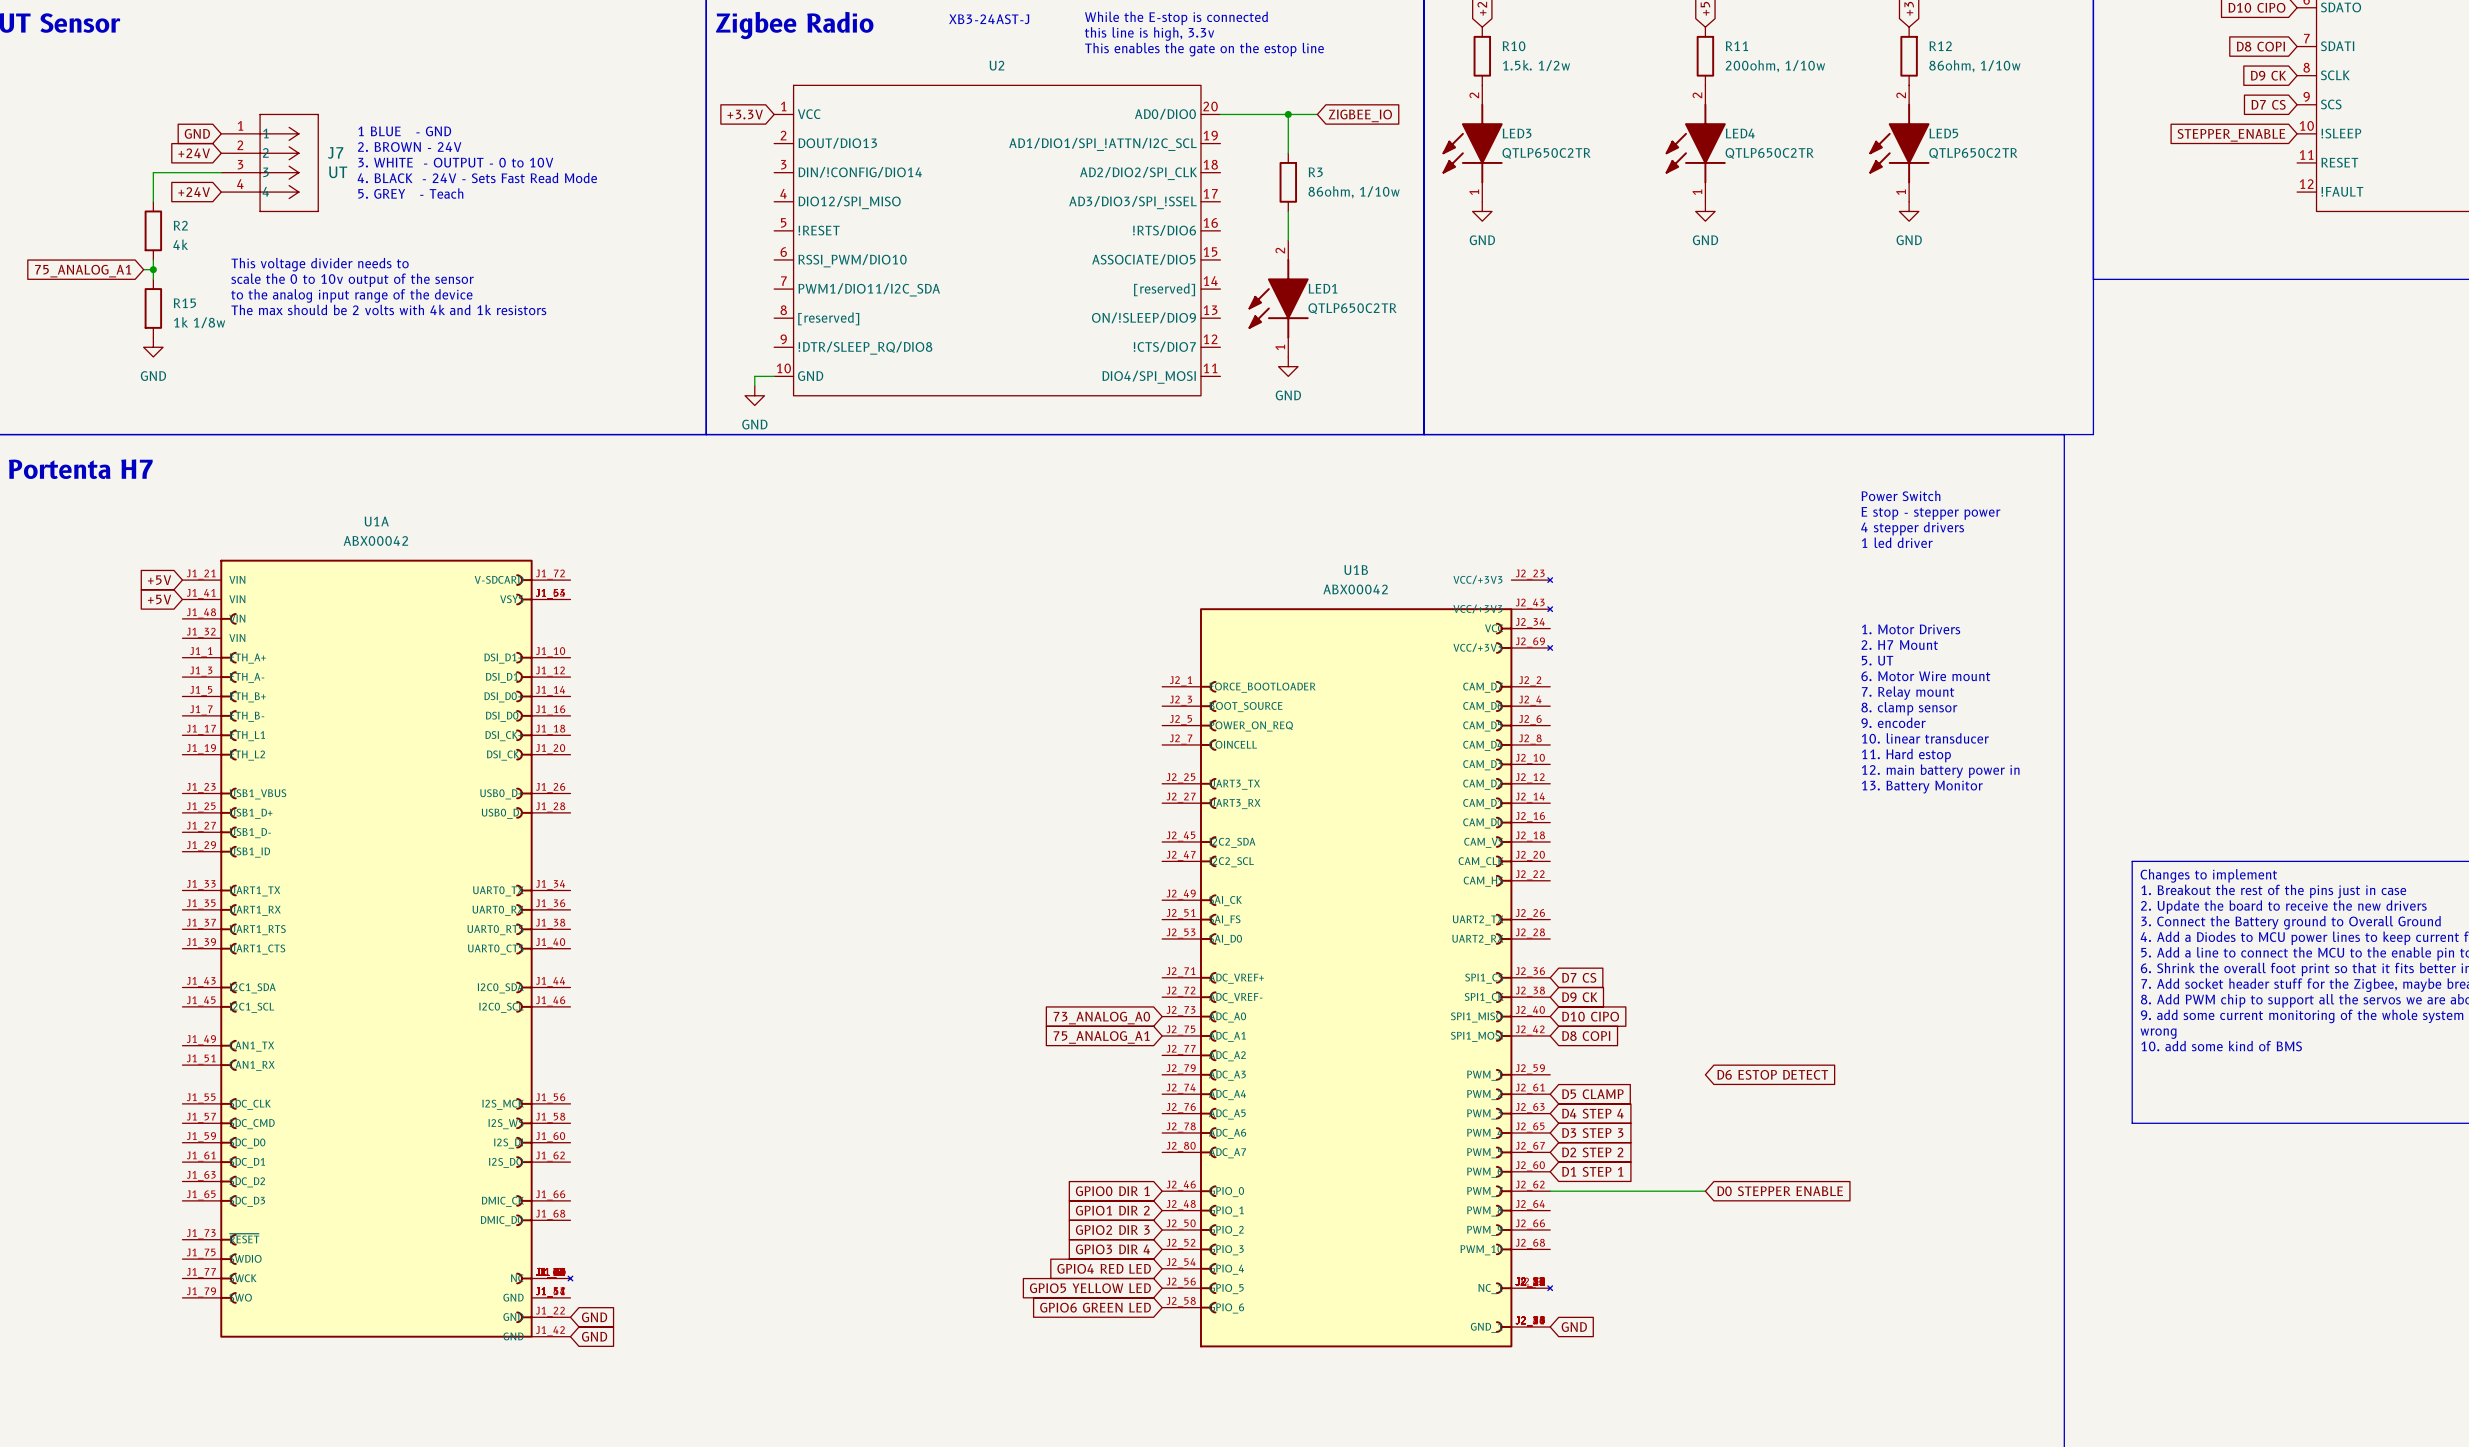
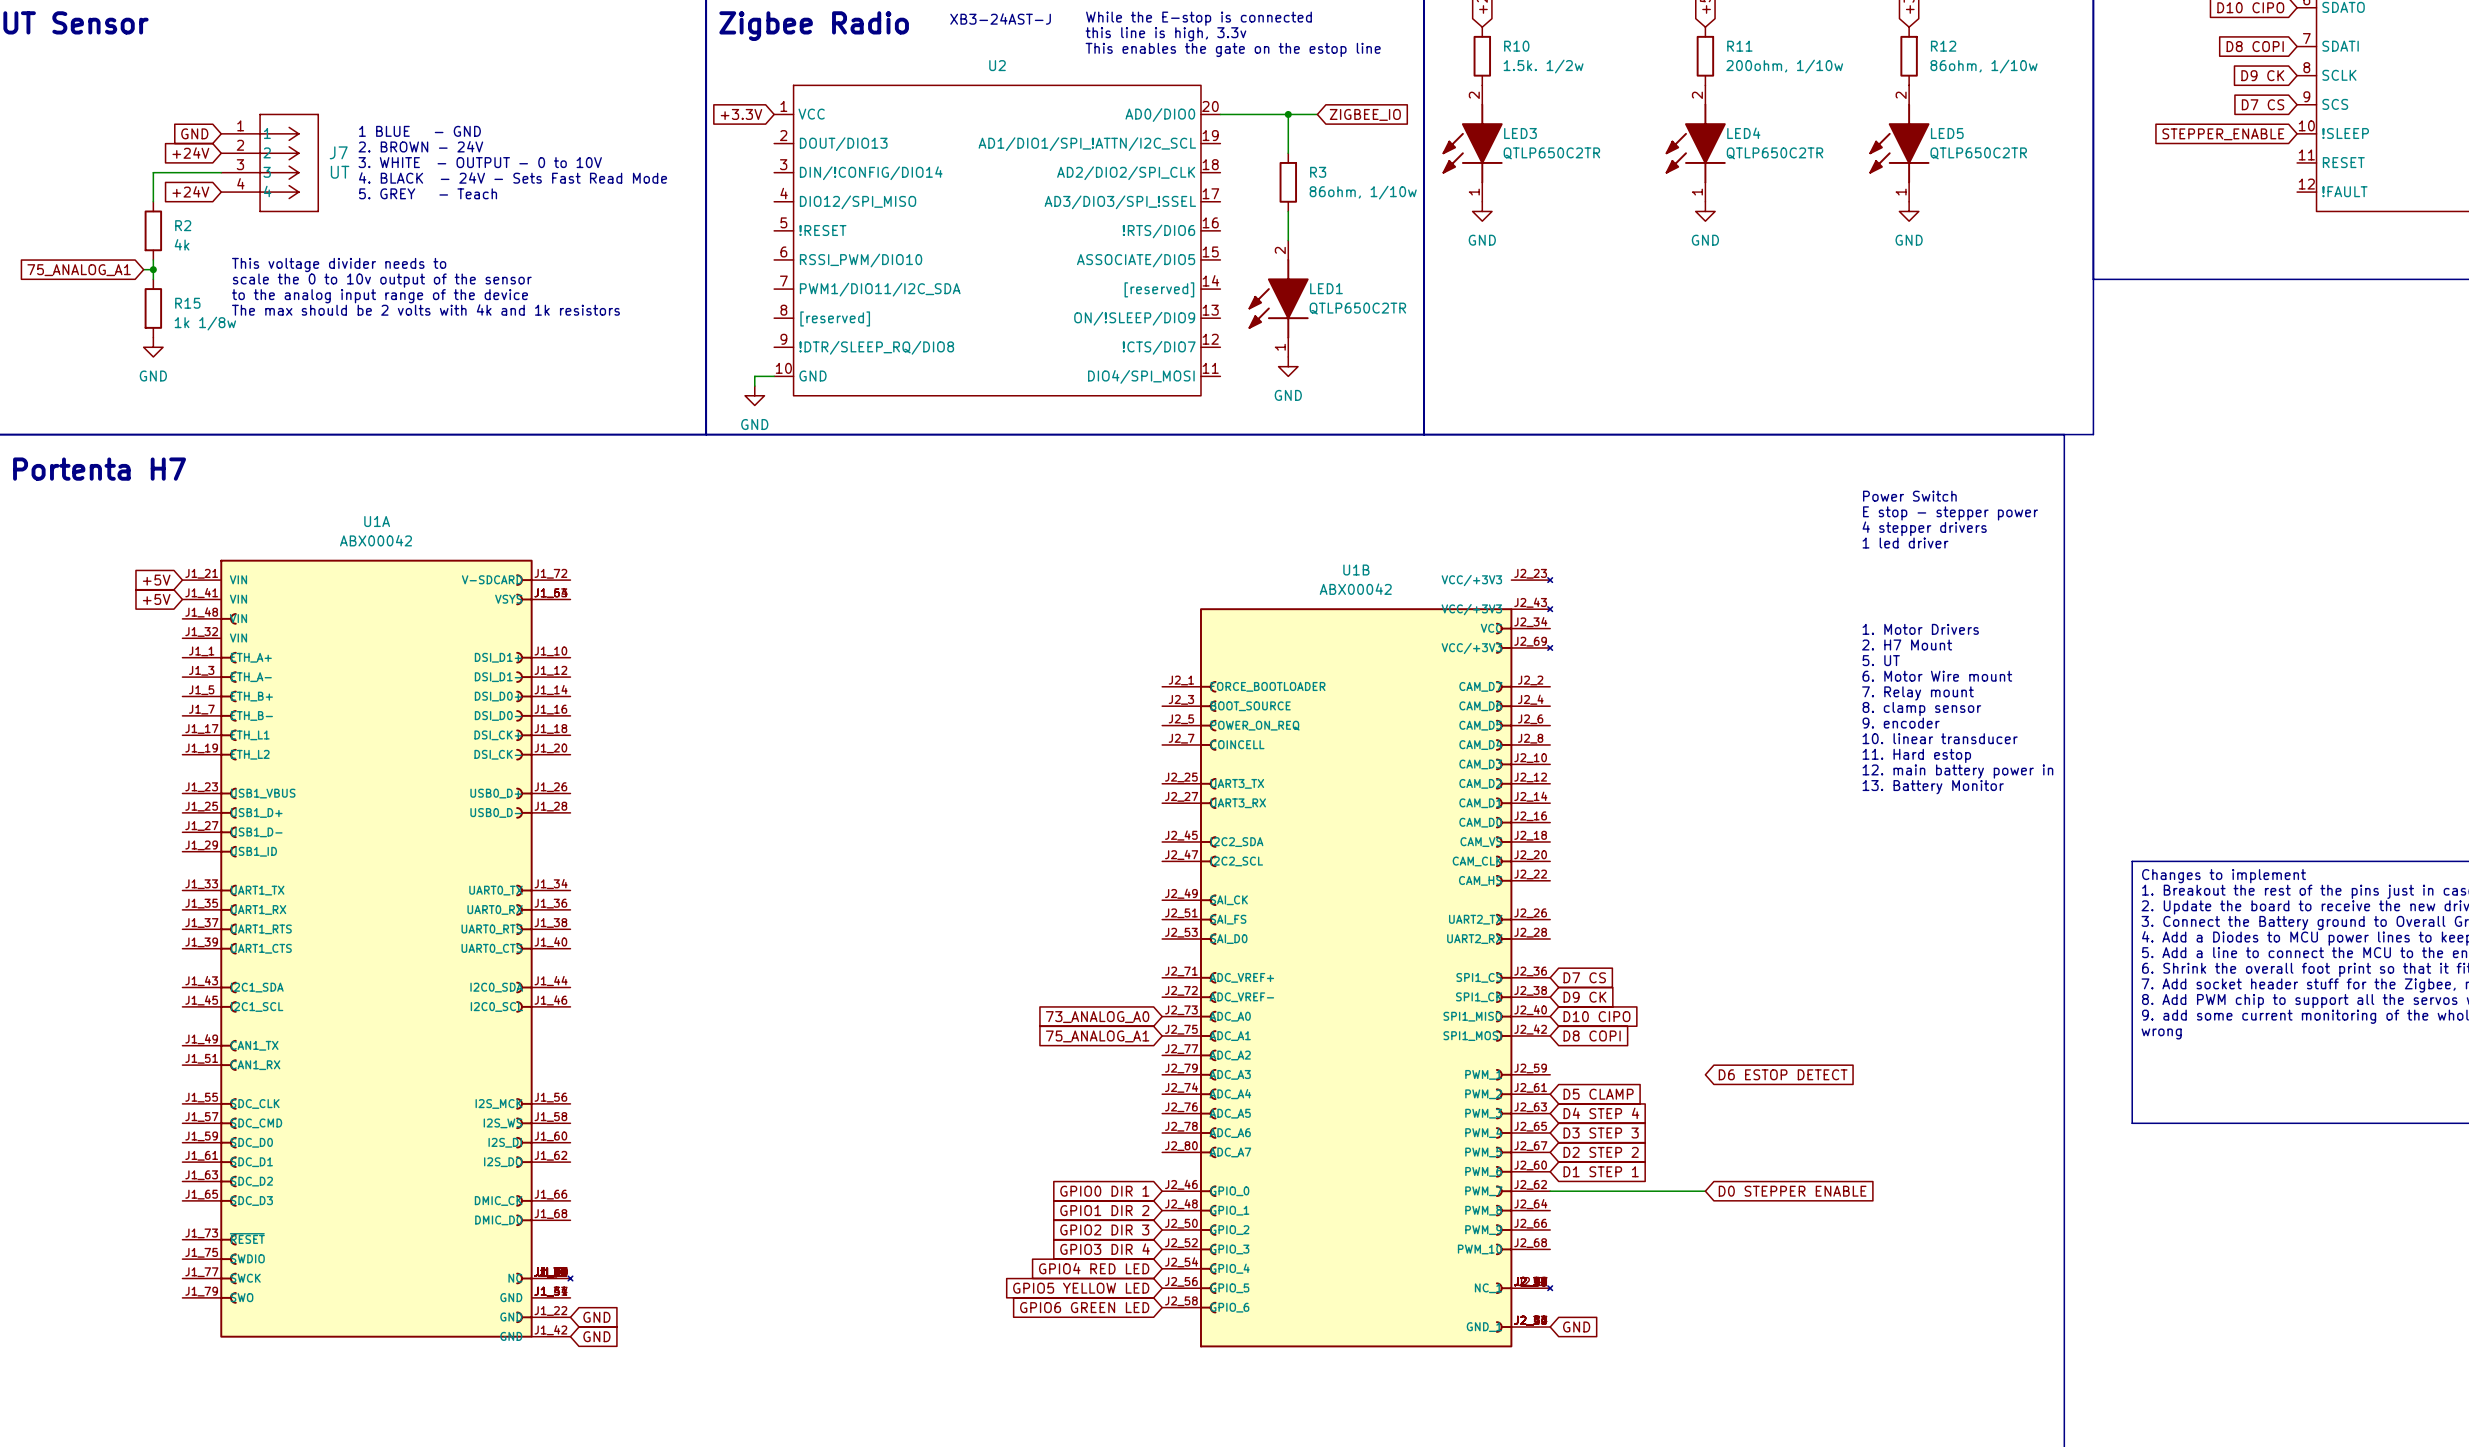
text: 10. add some kind of BMS (2221, 1046) -> none

